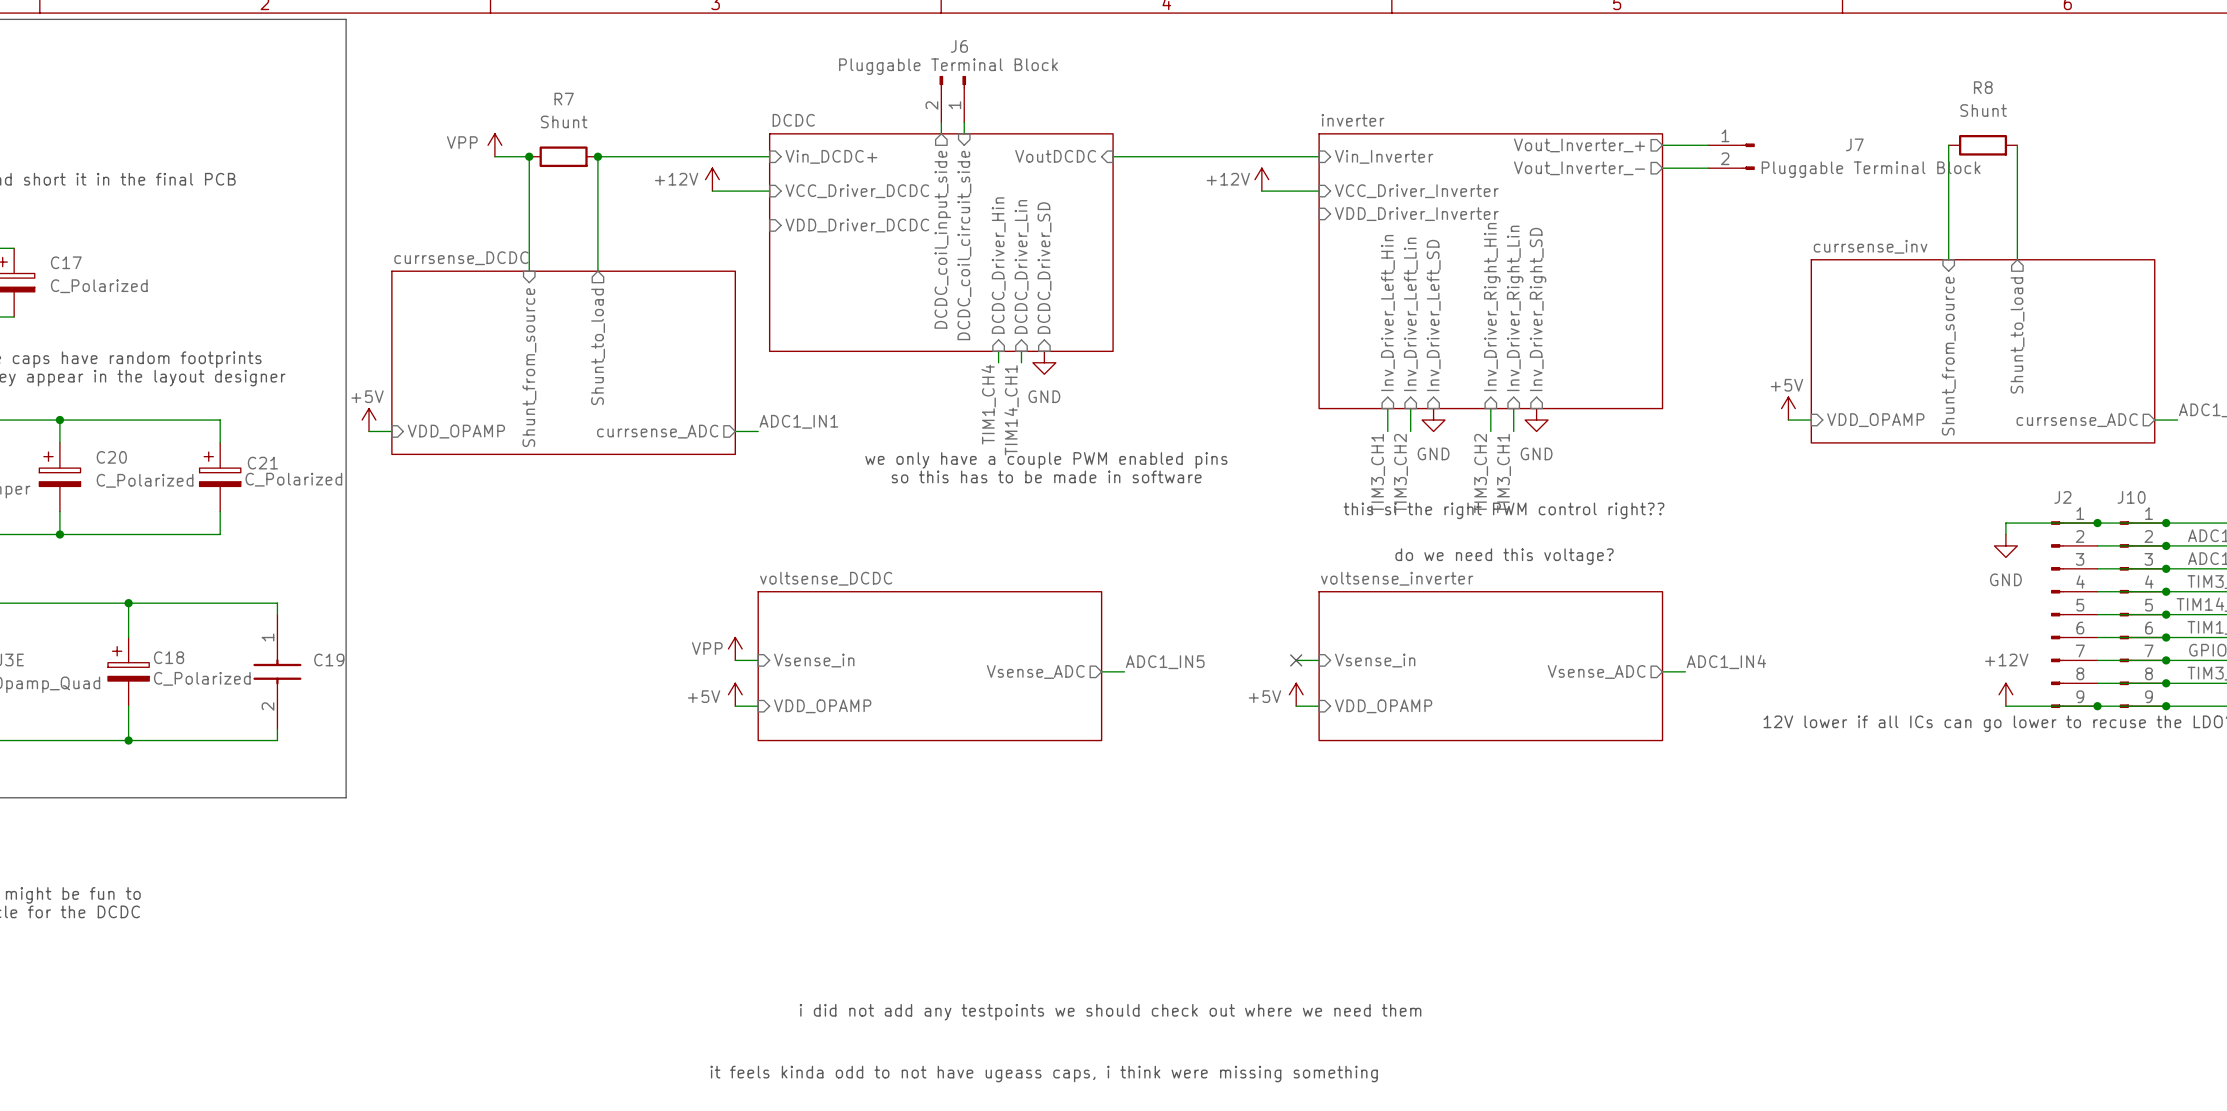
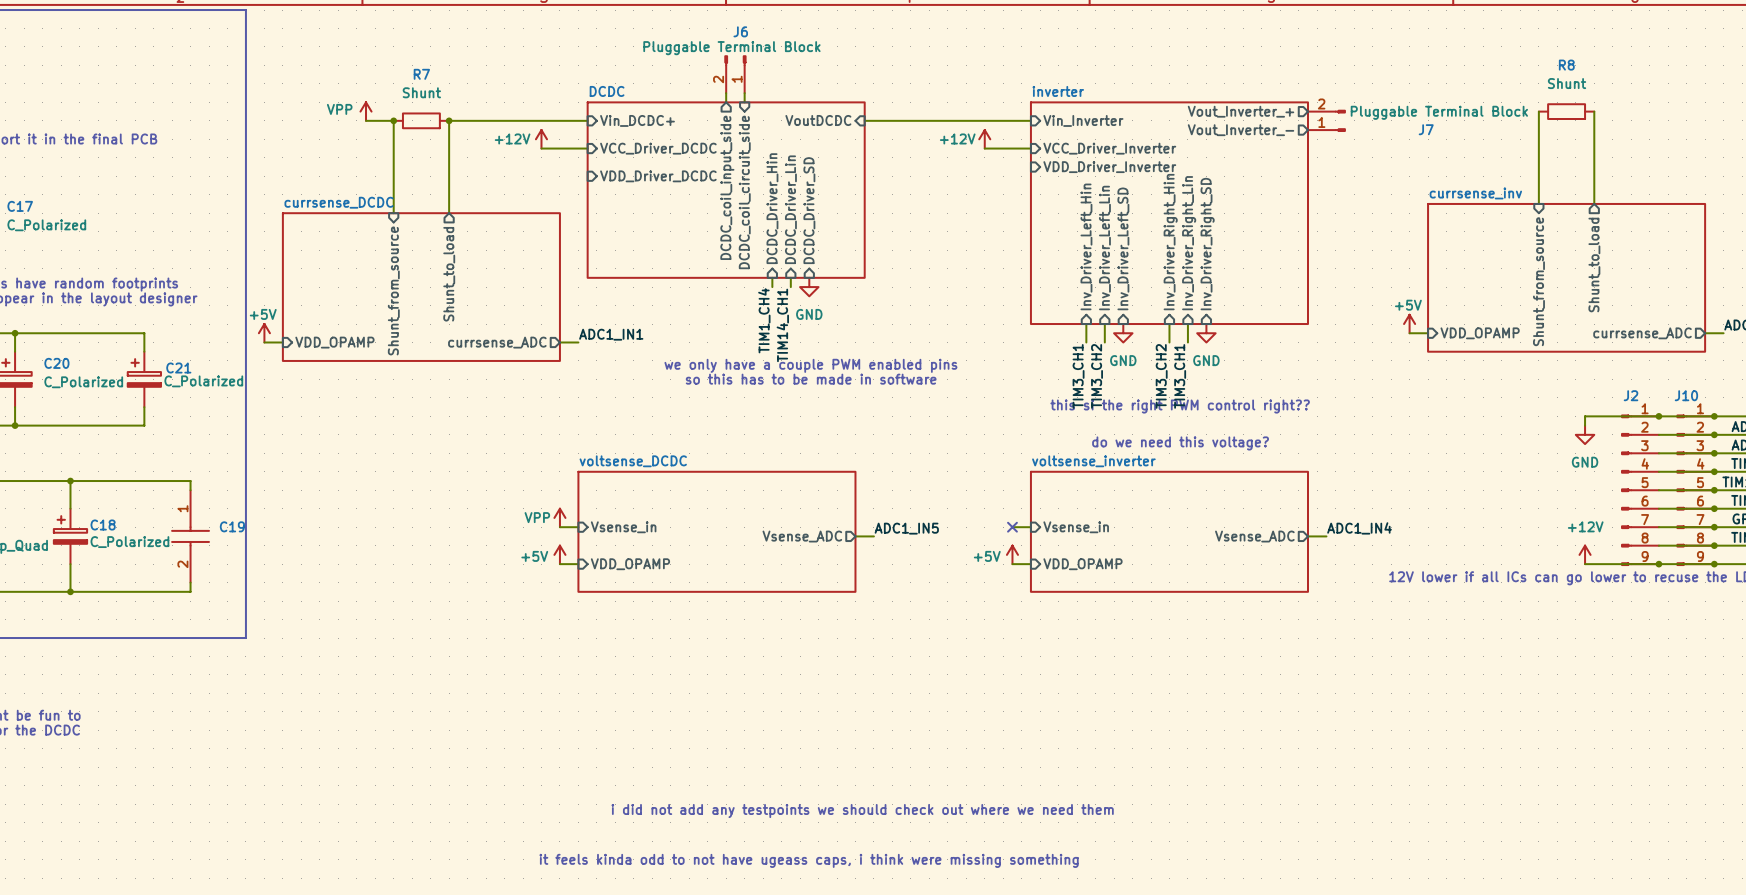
J7 position: (1731, 156) -> (1326, 120)
J7 flip: as is (1748, 156) -> up-down (1340, 120)

